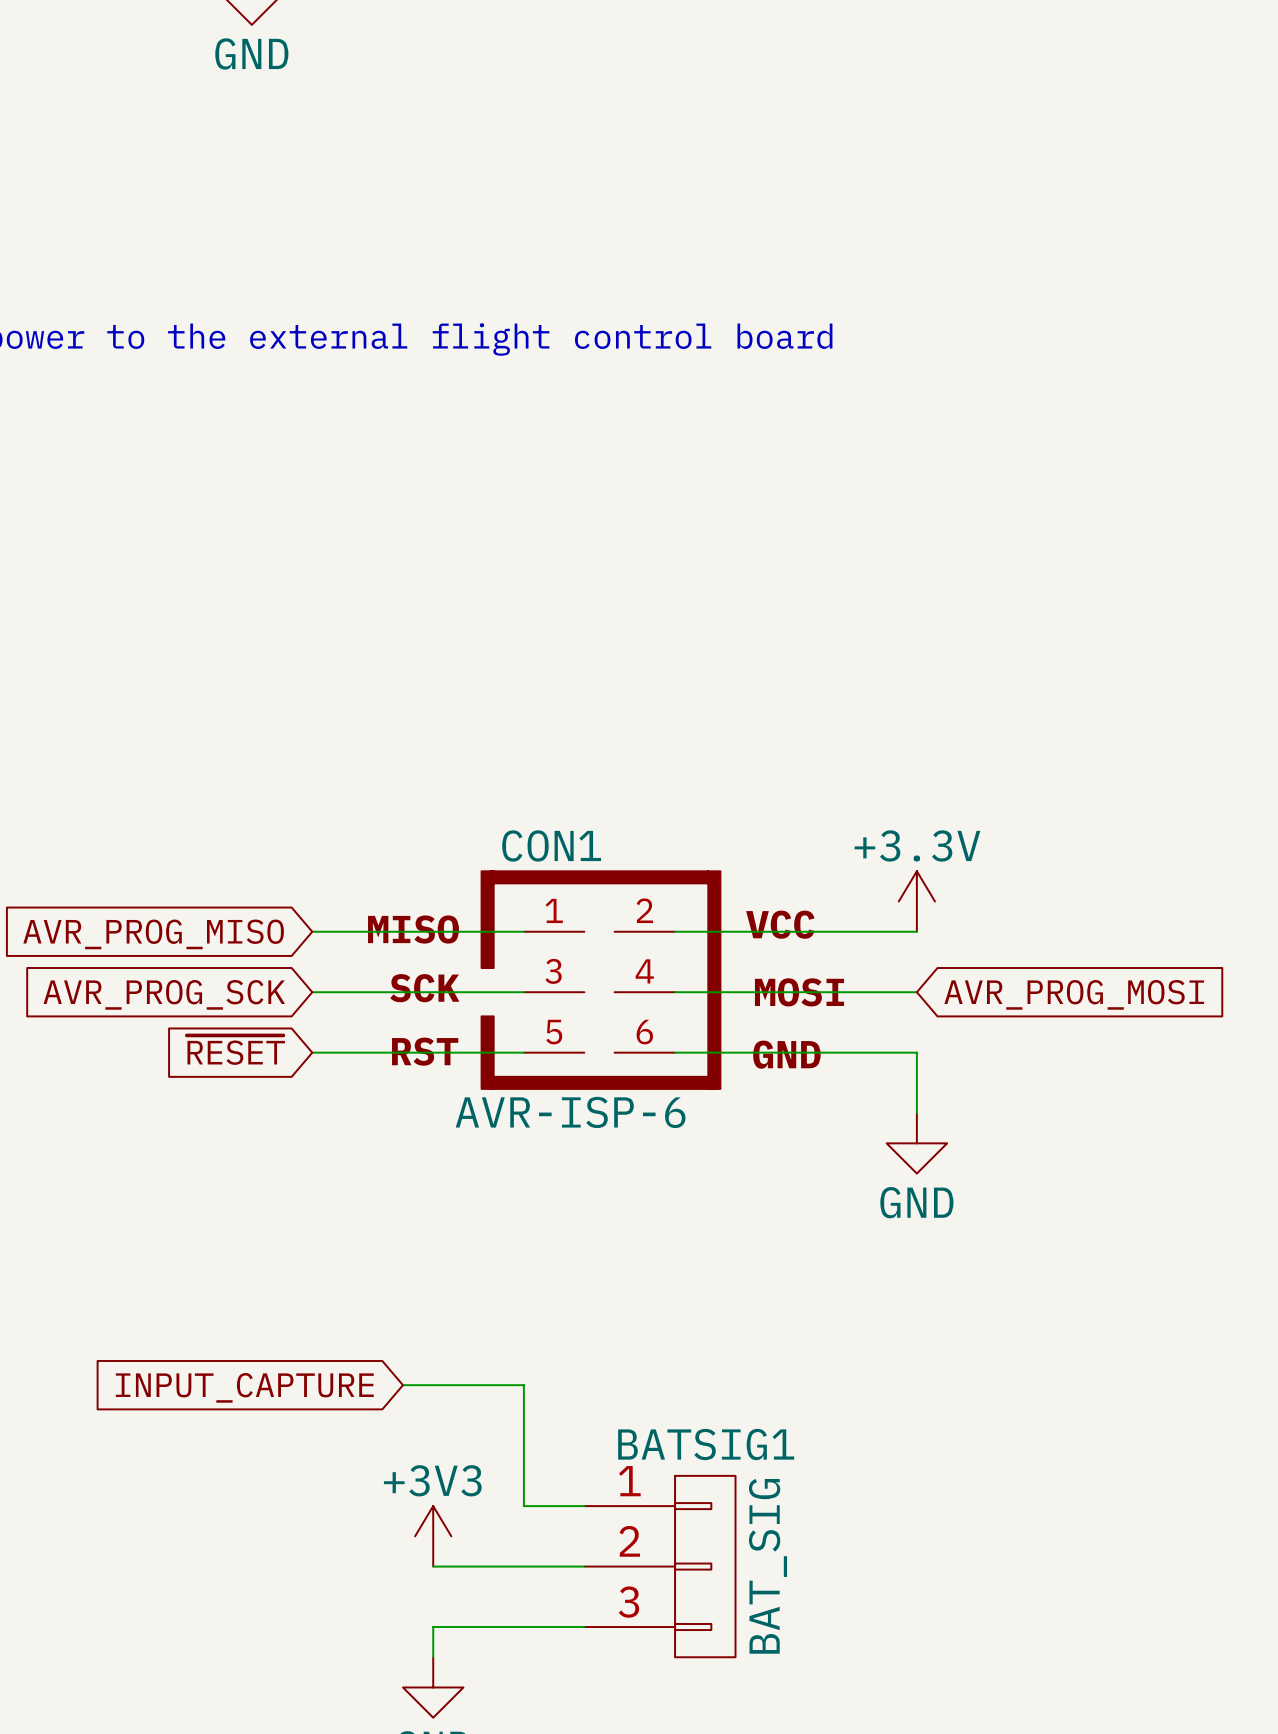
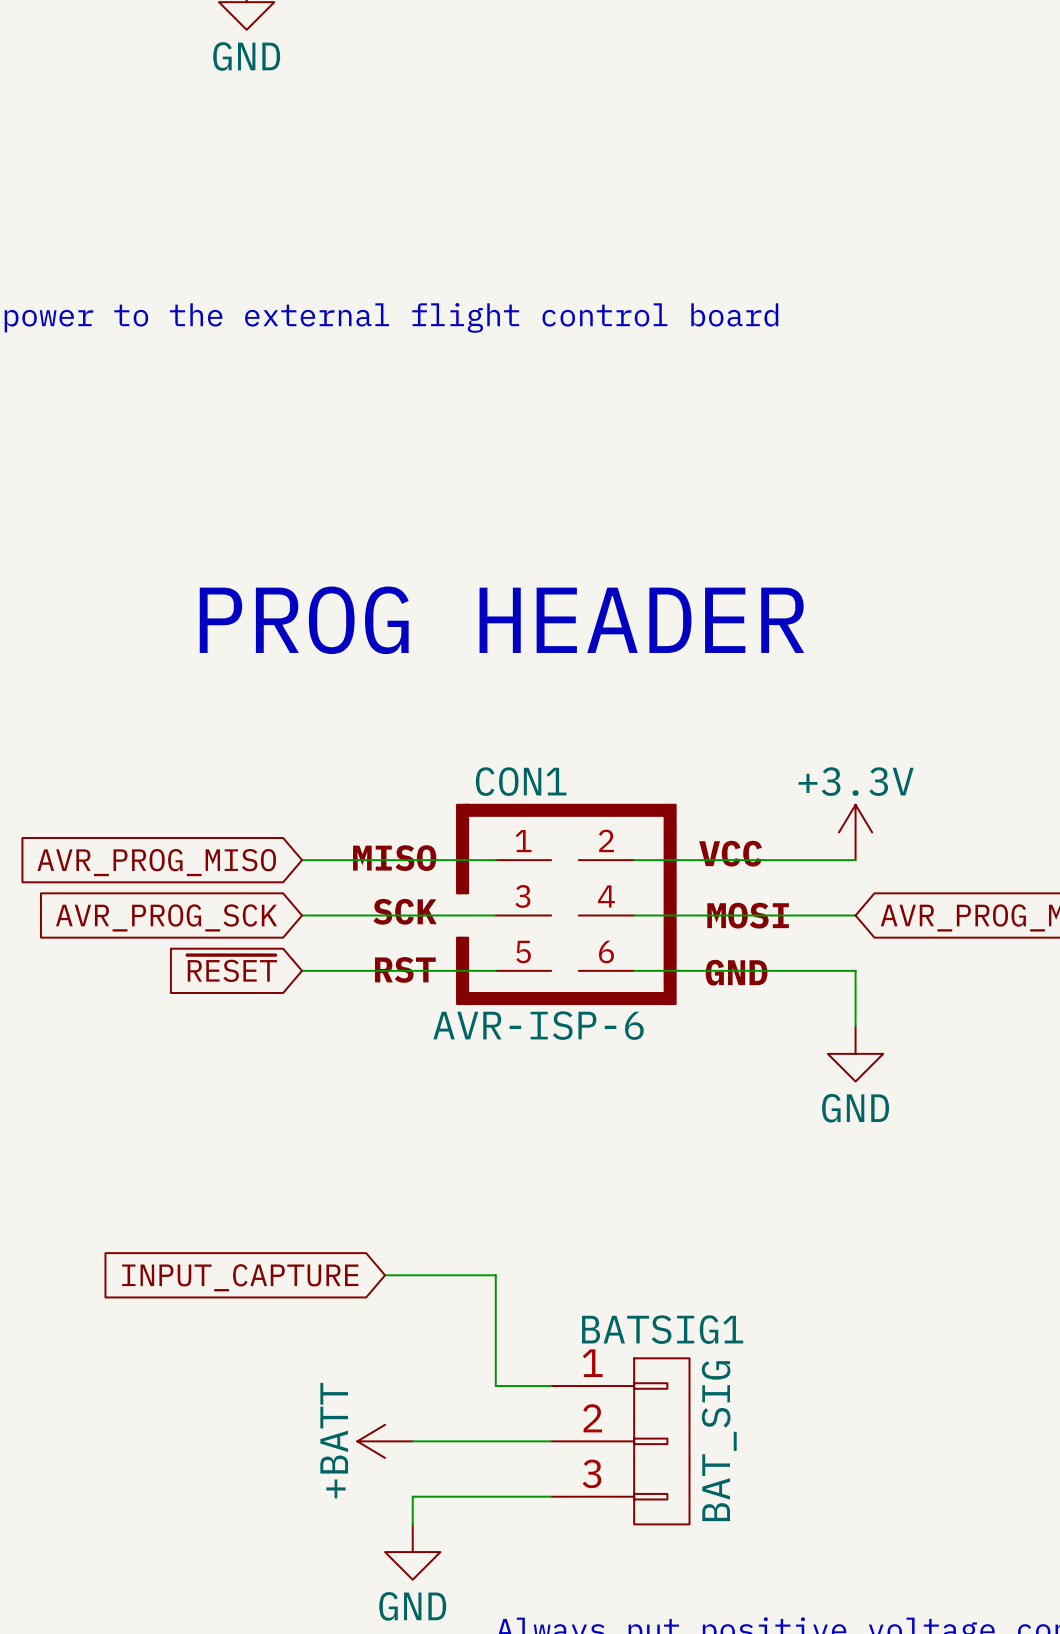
text: none -> PROG HEADER (501, 620)
power symbol: +3V3 (433, 1536) -> none
power symbol: none -> +BATT (385, 1441)

